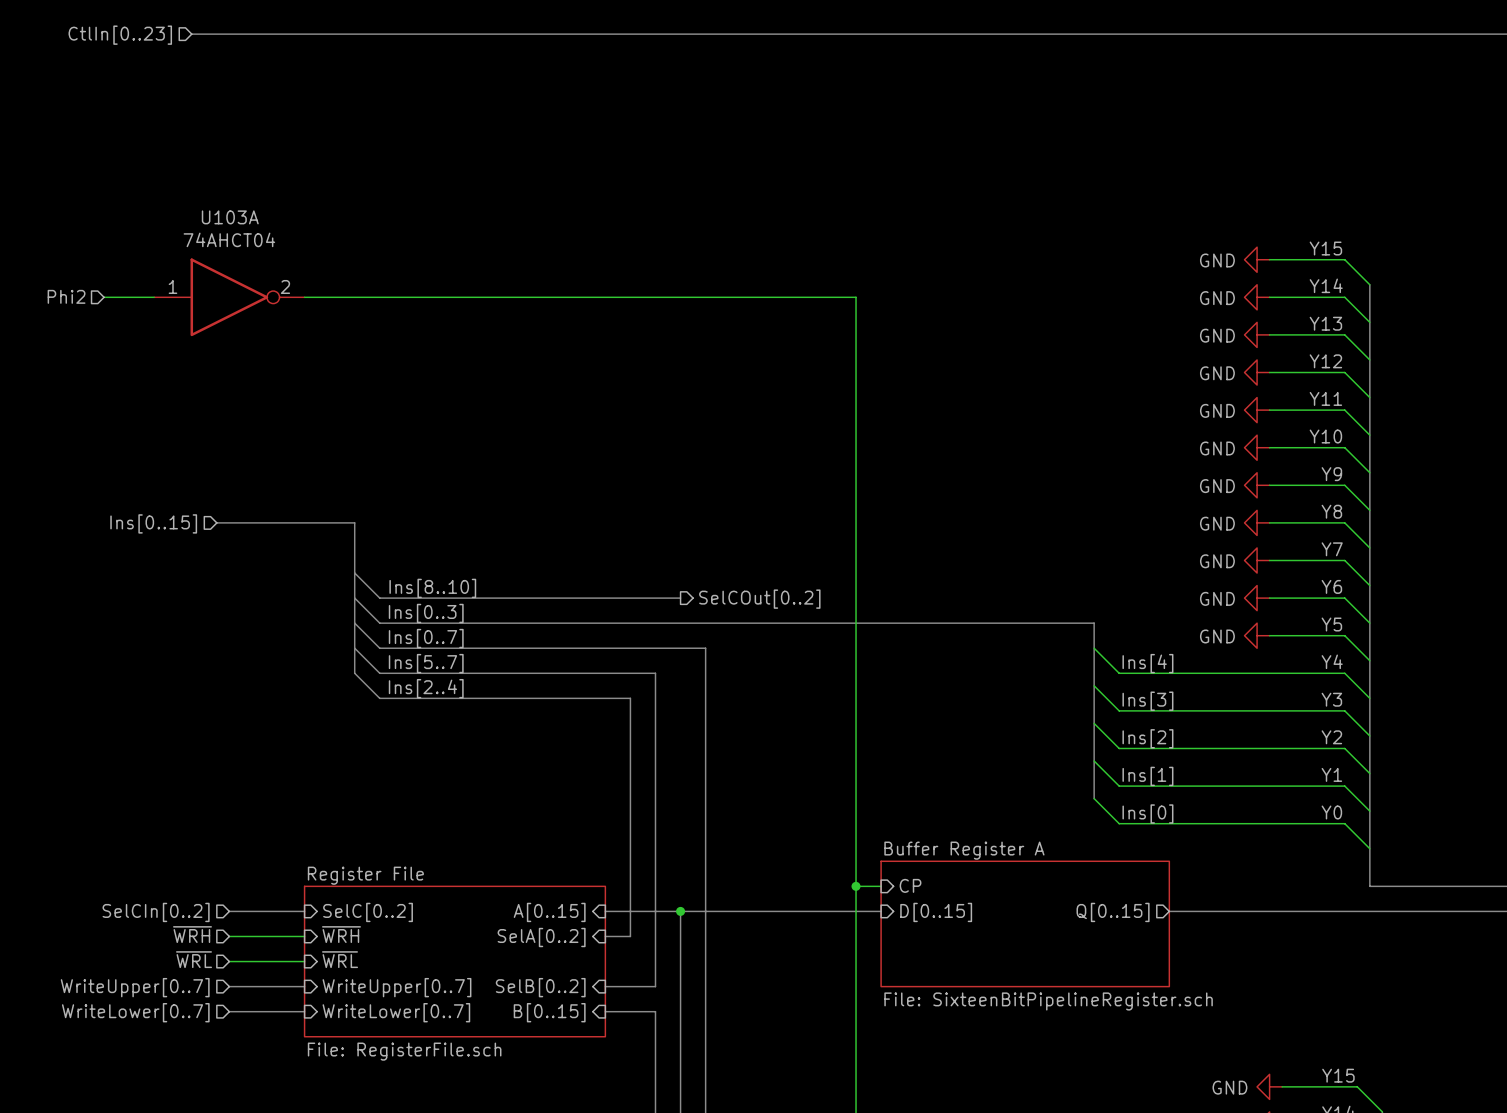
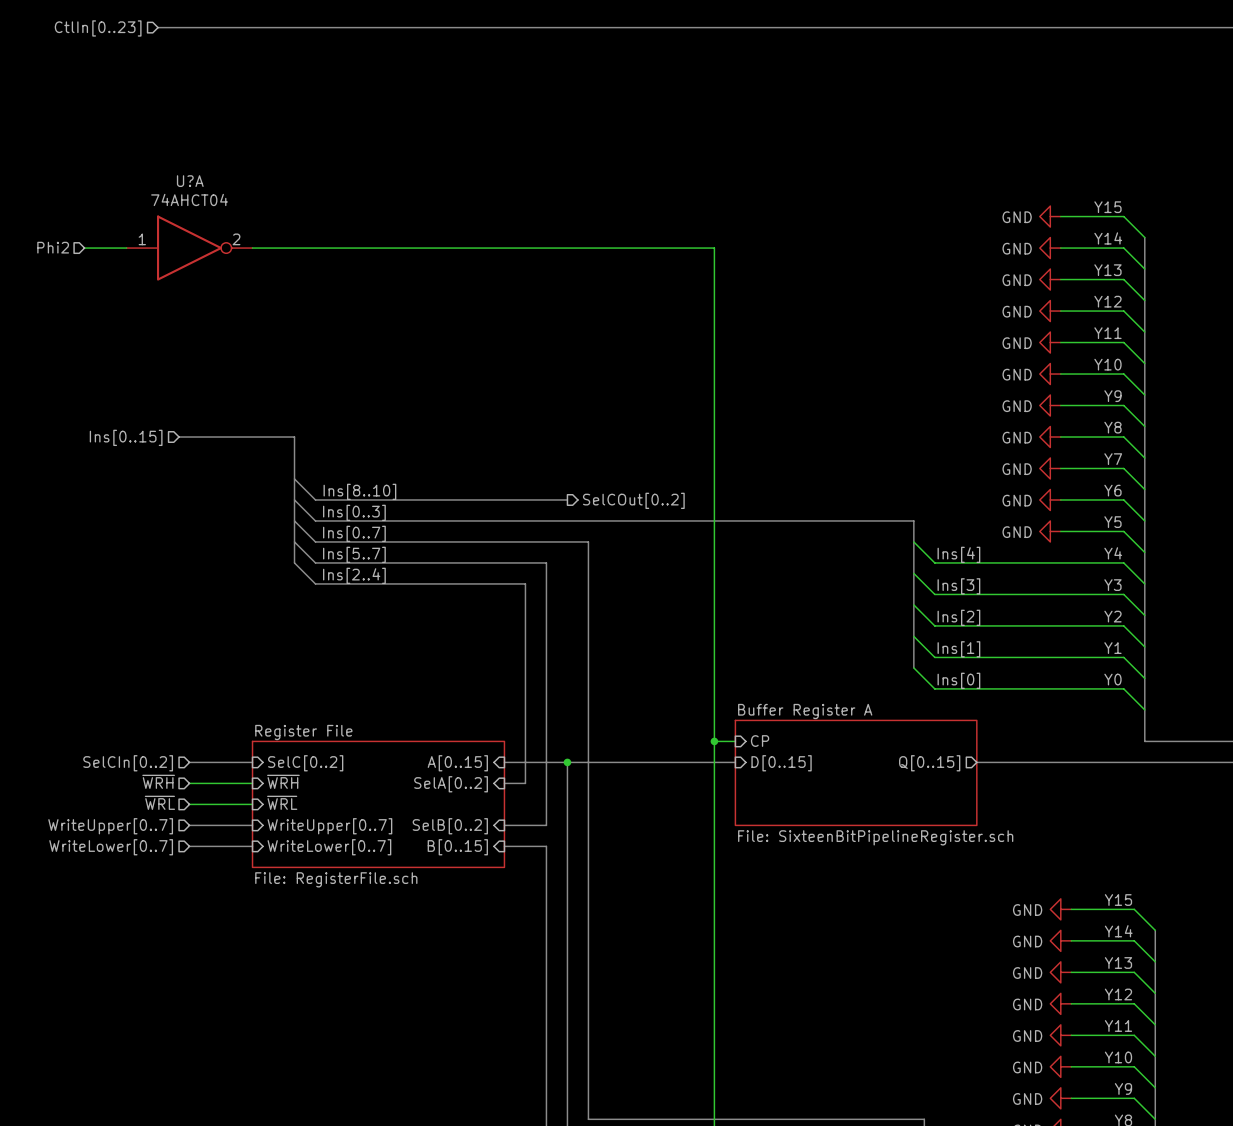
U103A name: U103A (230, 217) -> U?A (190, 181)

